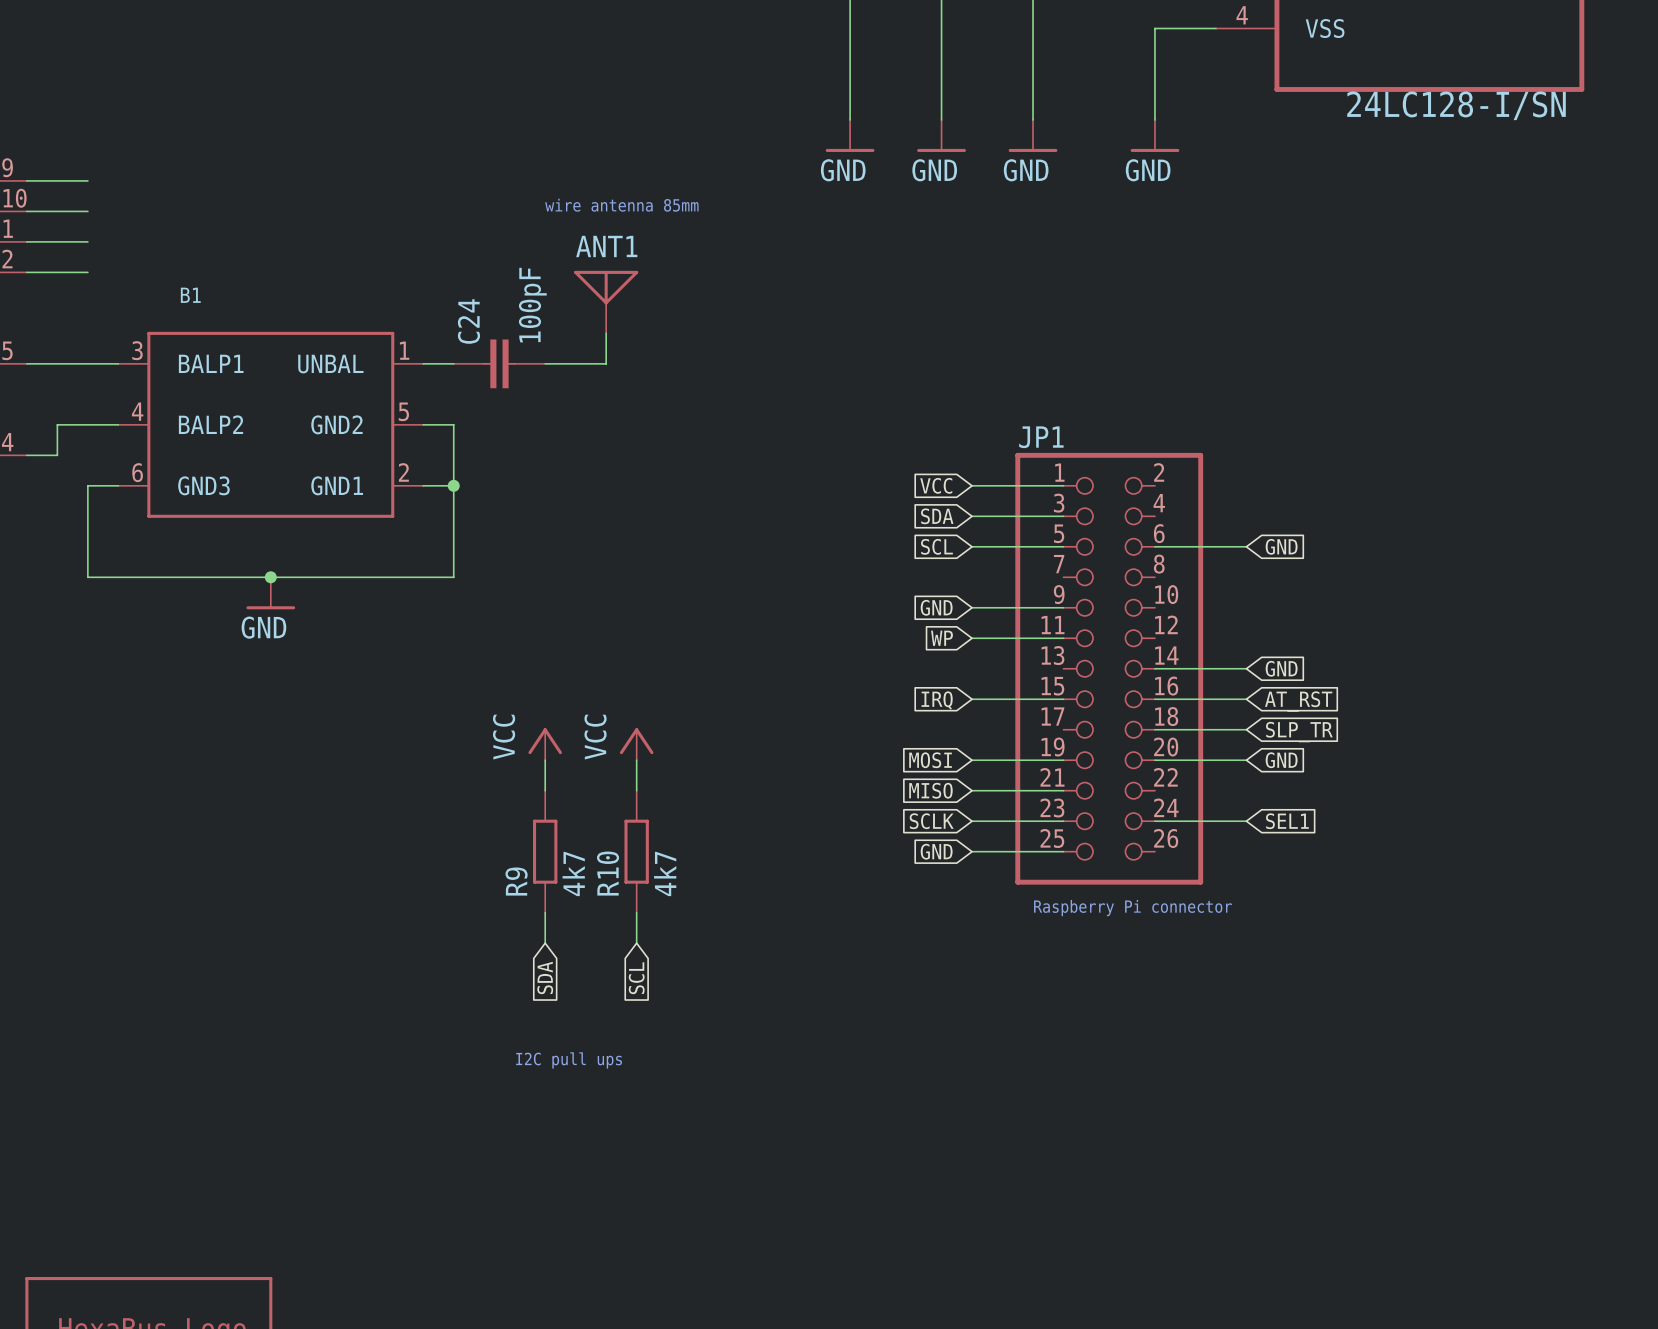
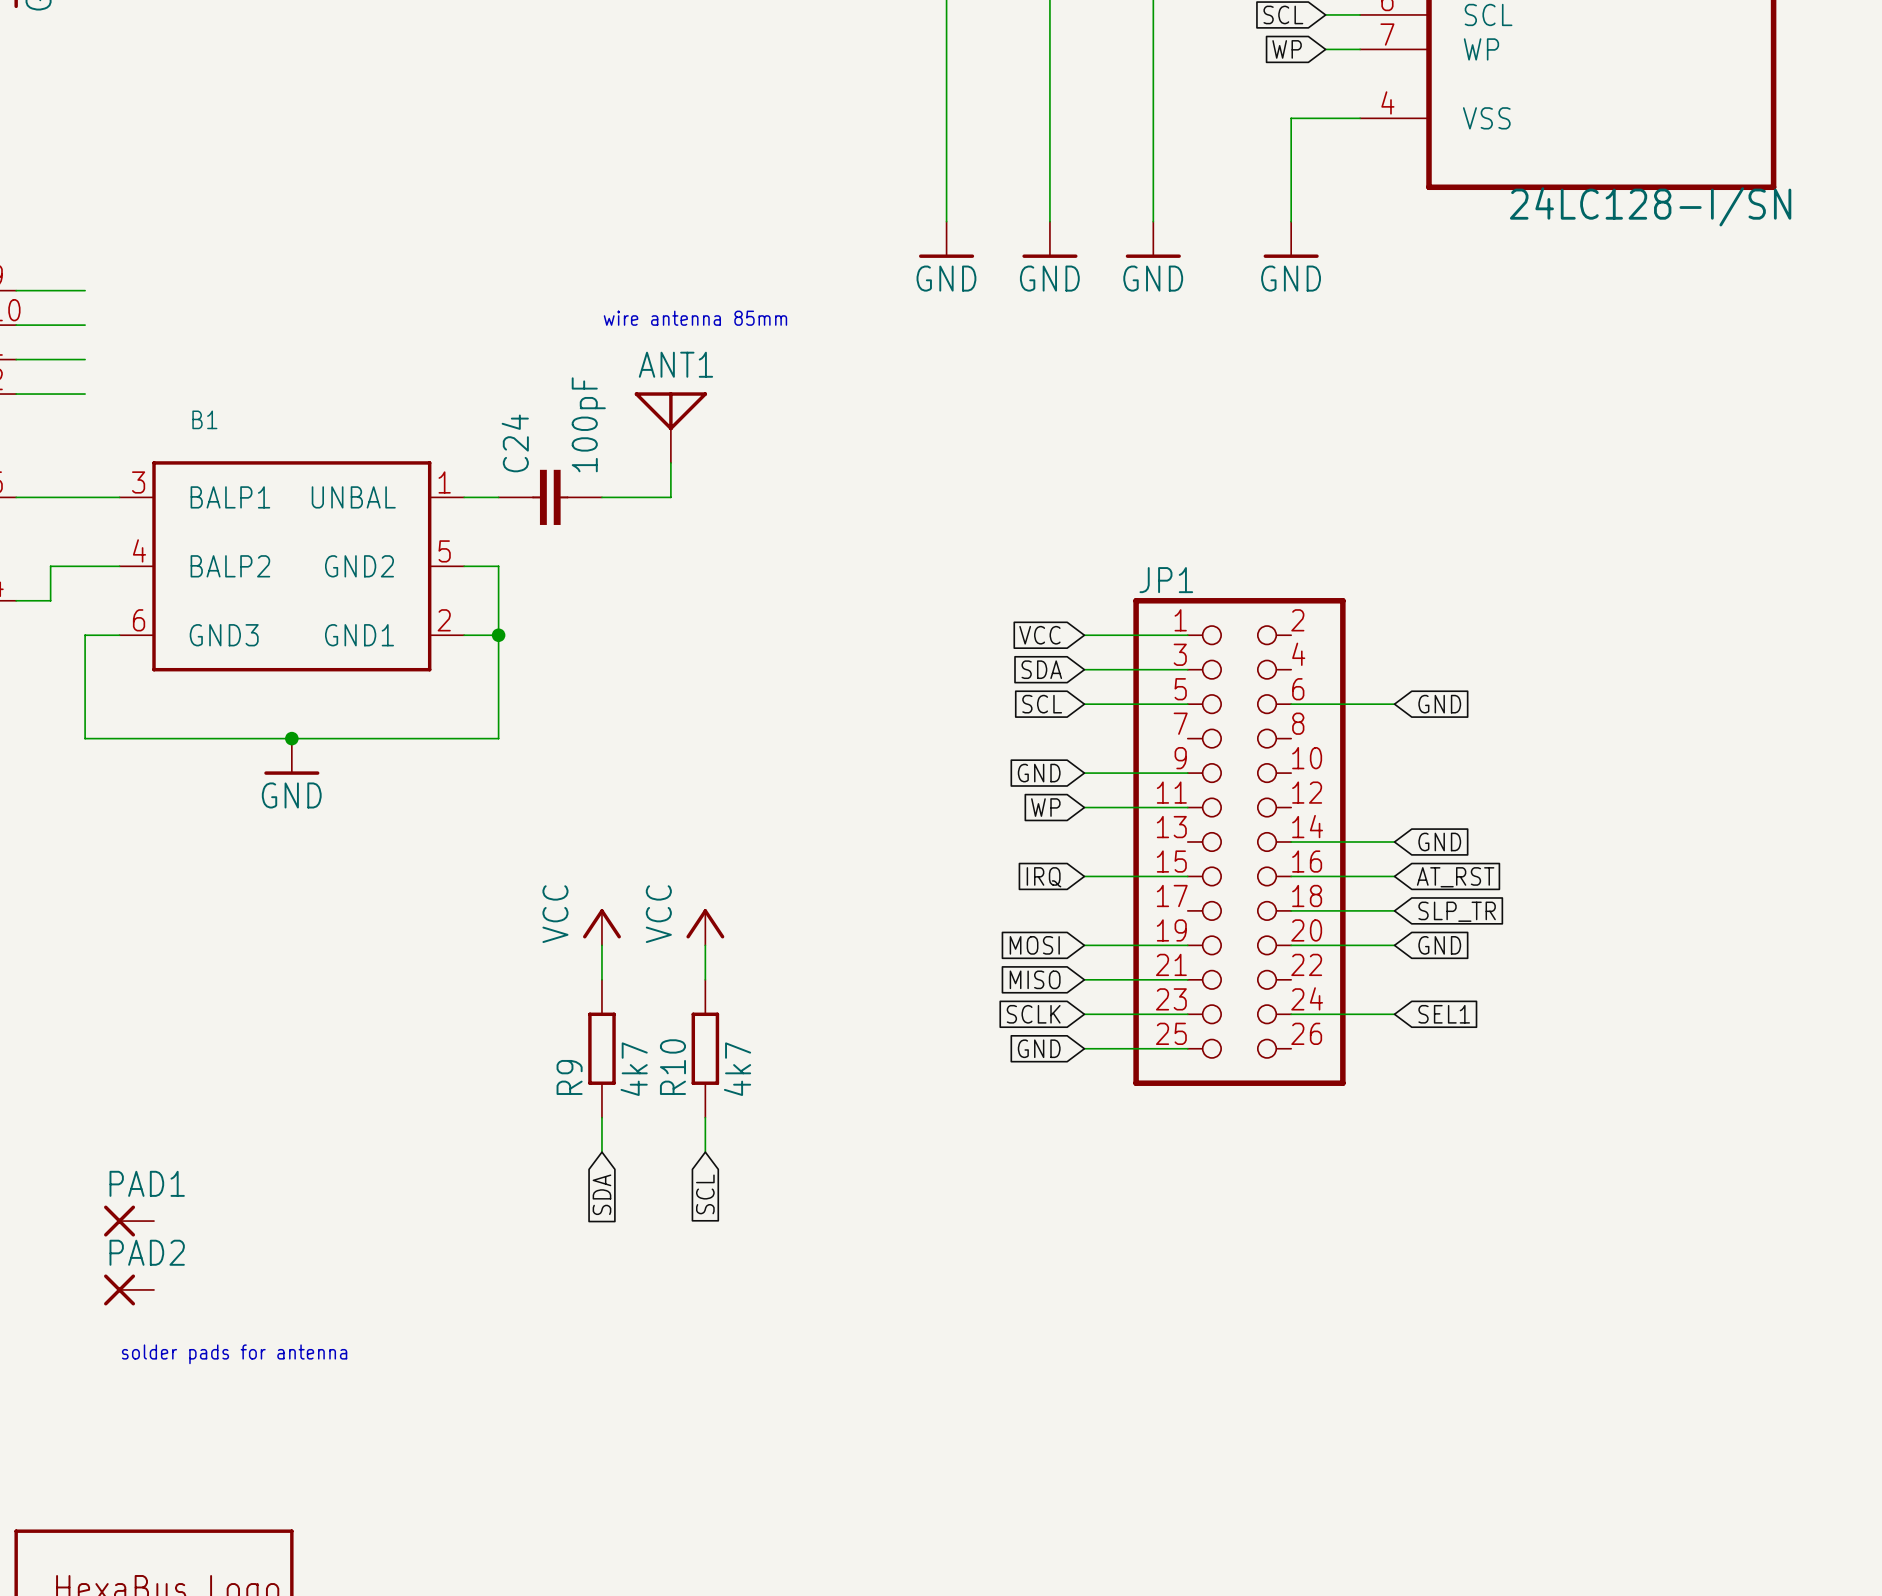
text: Raspberry Pi connector (1132, 908) -> none
PAD1: none -> (129, 1221)
text: I2C pull ups (569, 1060) -> none
PAD2: none -> (129, 1289)
text: none -> solder pads for antenna (234, 1354)

